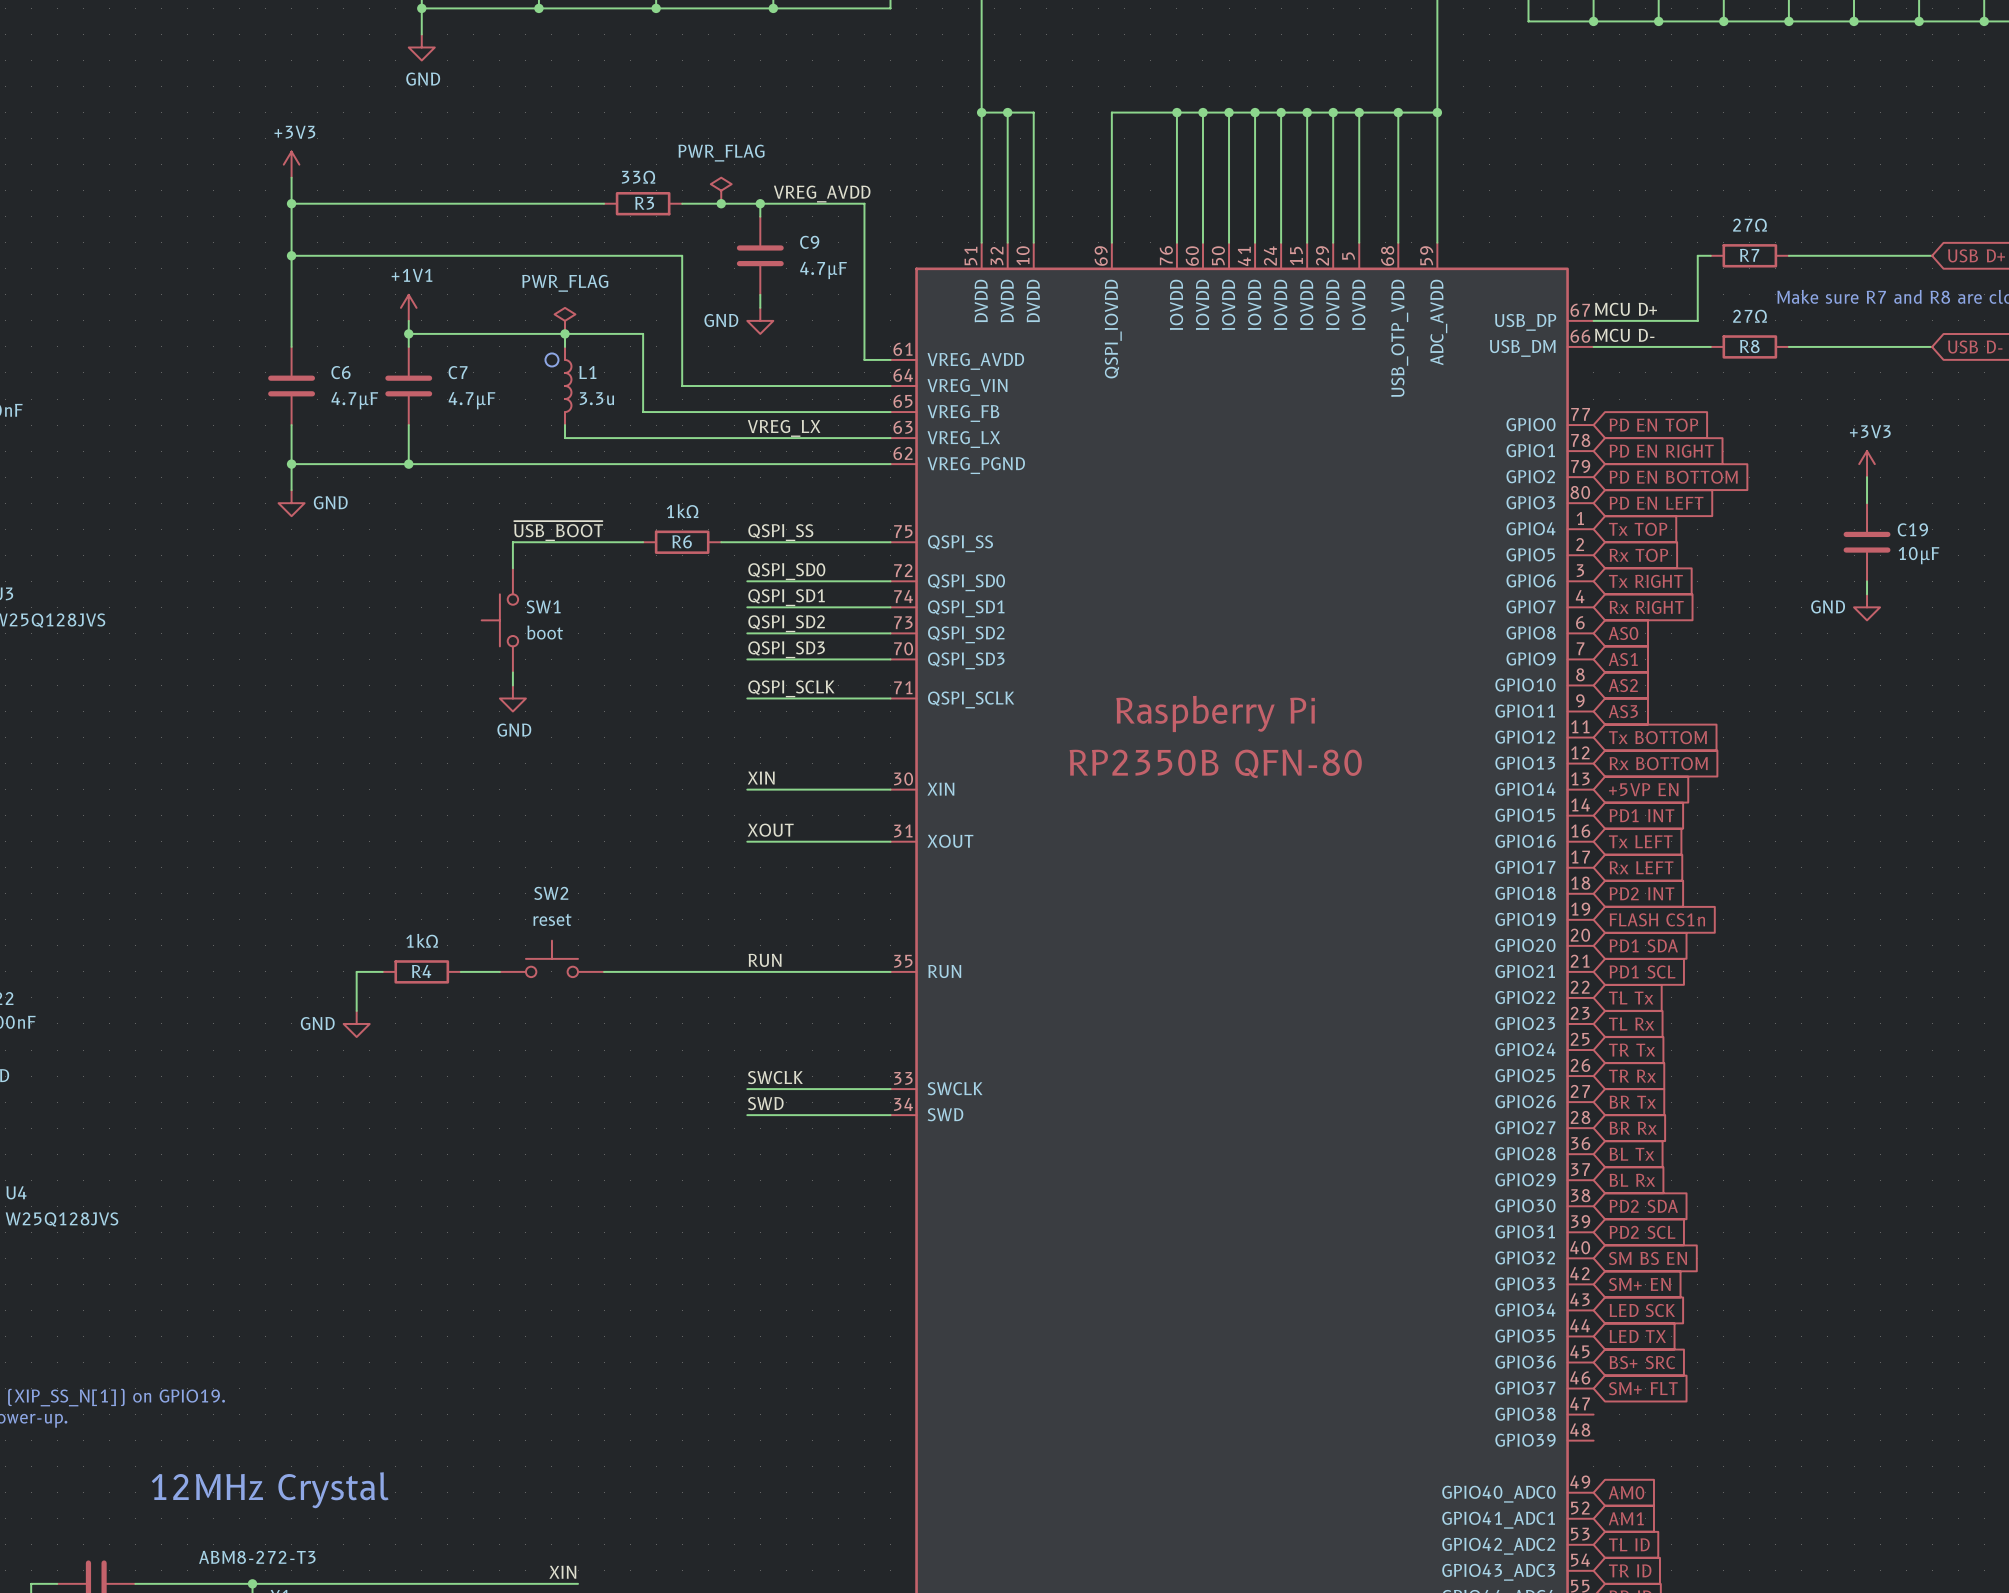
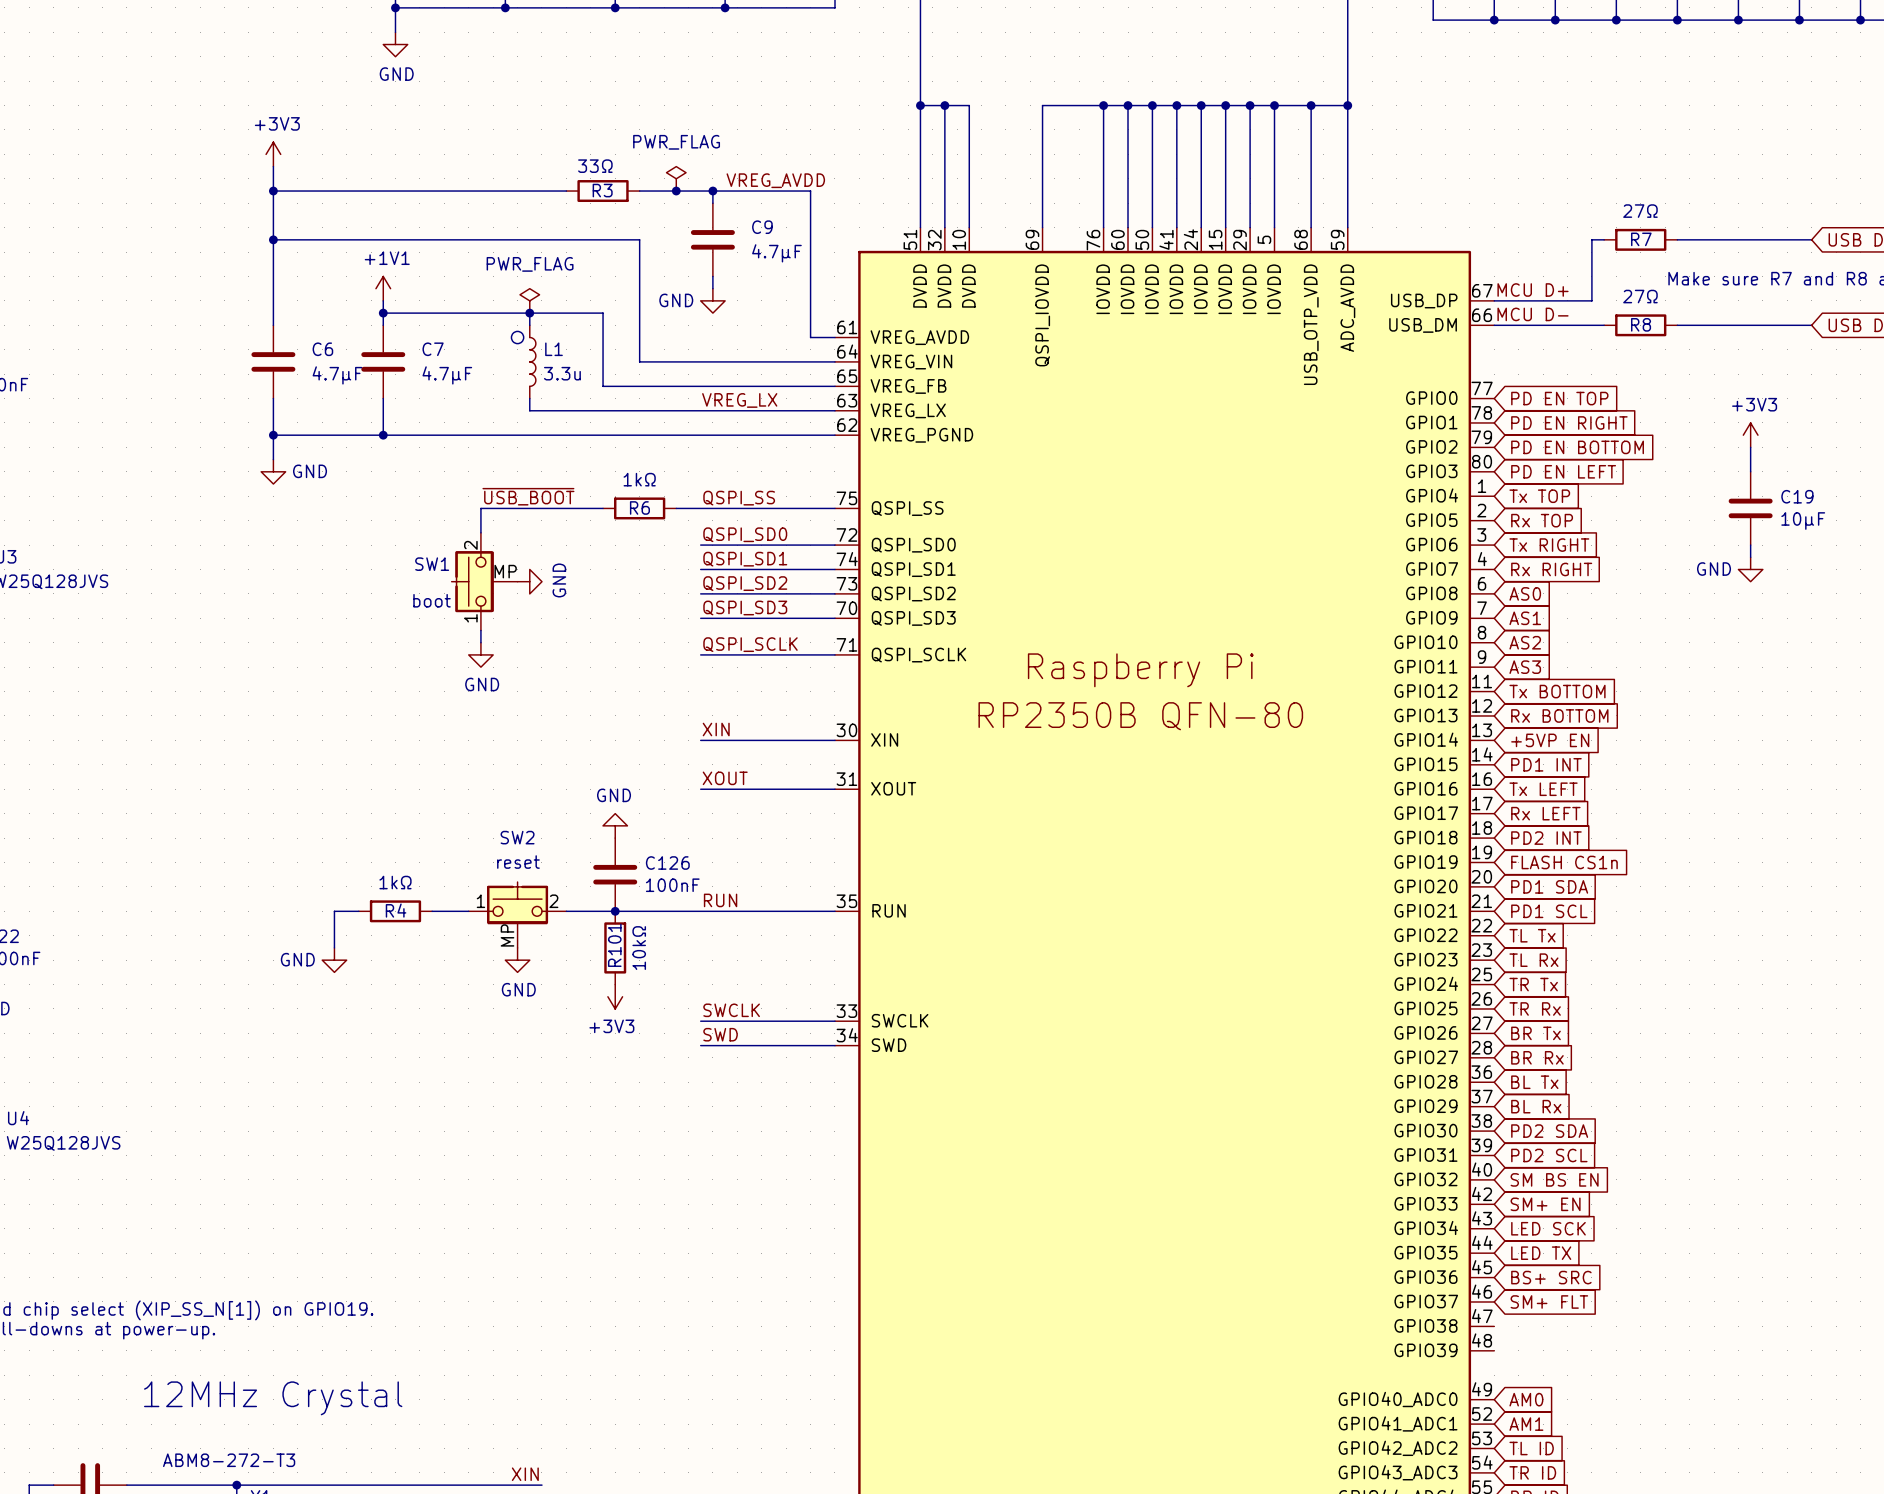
SW1 symbol: [481, 568, 519, 673] -> [451, 532, 518, 631]
SW1 name position: SW1 (543, 606) -> SW1 (432, 564)
power symbol: none -> GND (529, 581)
SW1 value position: boot (545, 632) -> boot (432, 600)
power symbol: none -> GND (615, 825)
C126: none -> 100nF (615, 874)
SW2 symbol: [499, 940, 605, 978] -> [468, 882, 567, 948]
junction: none -> (615, 911)
R101: none -> 10kΩ (615, 947)
power symbol: none -> GND (517, 960)
power symbol: none -> +3V3 (615, 996)

